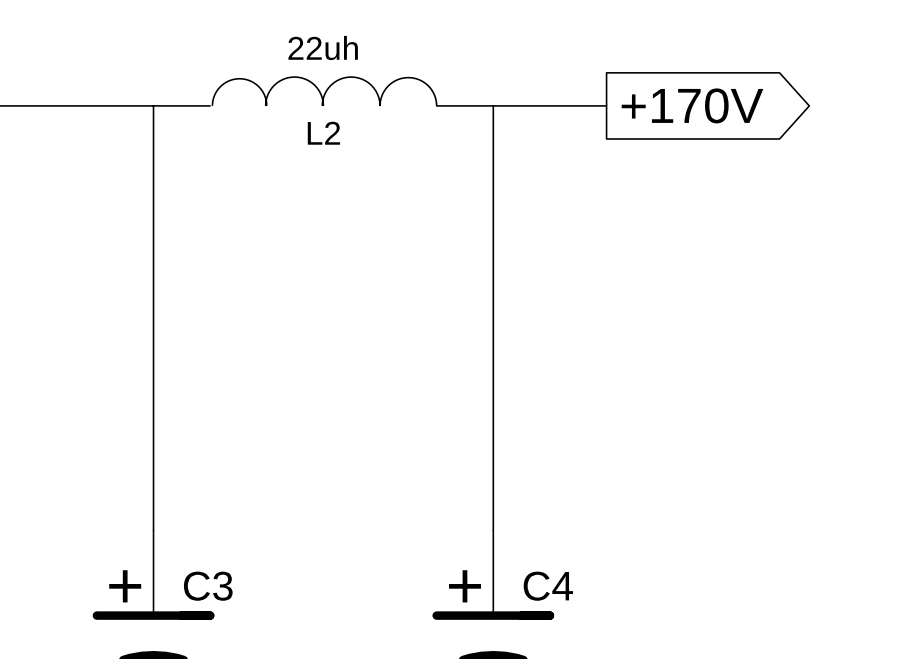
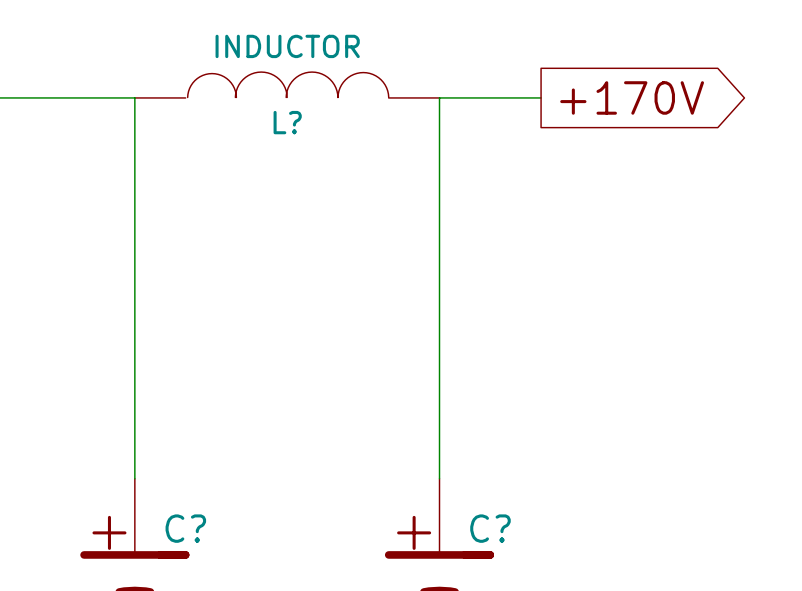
L2 value: 22uh (323, 48) -> INDUCTOR (287, 46)
L2 name: L2 (323, 133) -> L? (287, 122)
C3 name: C3 (208, 586) -> C? (185, 528)
C4 name: C4 (548, 586) -> C? (490, 528)

